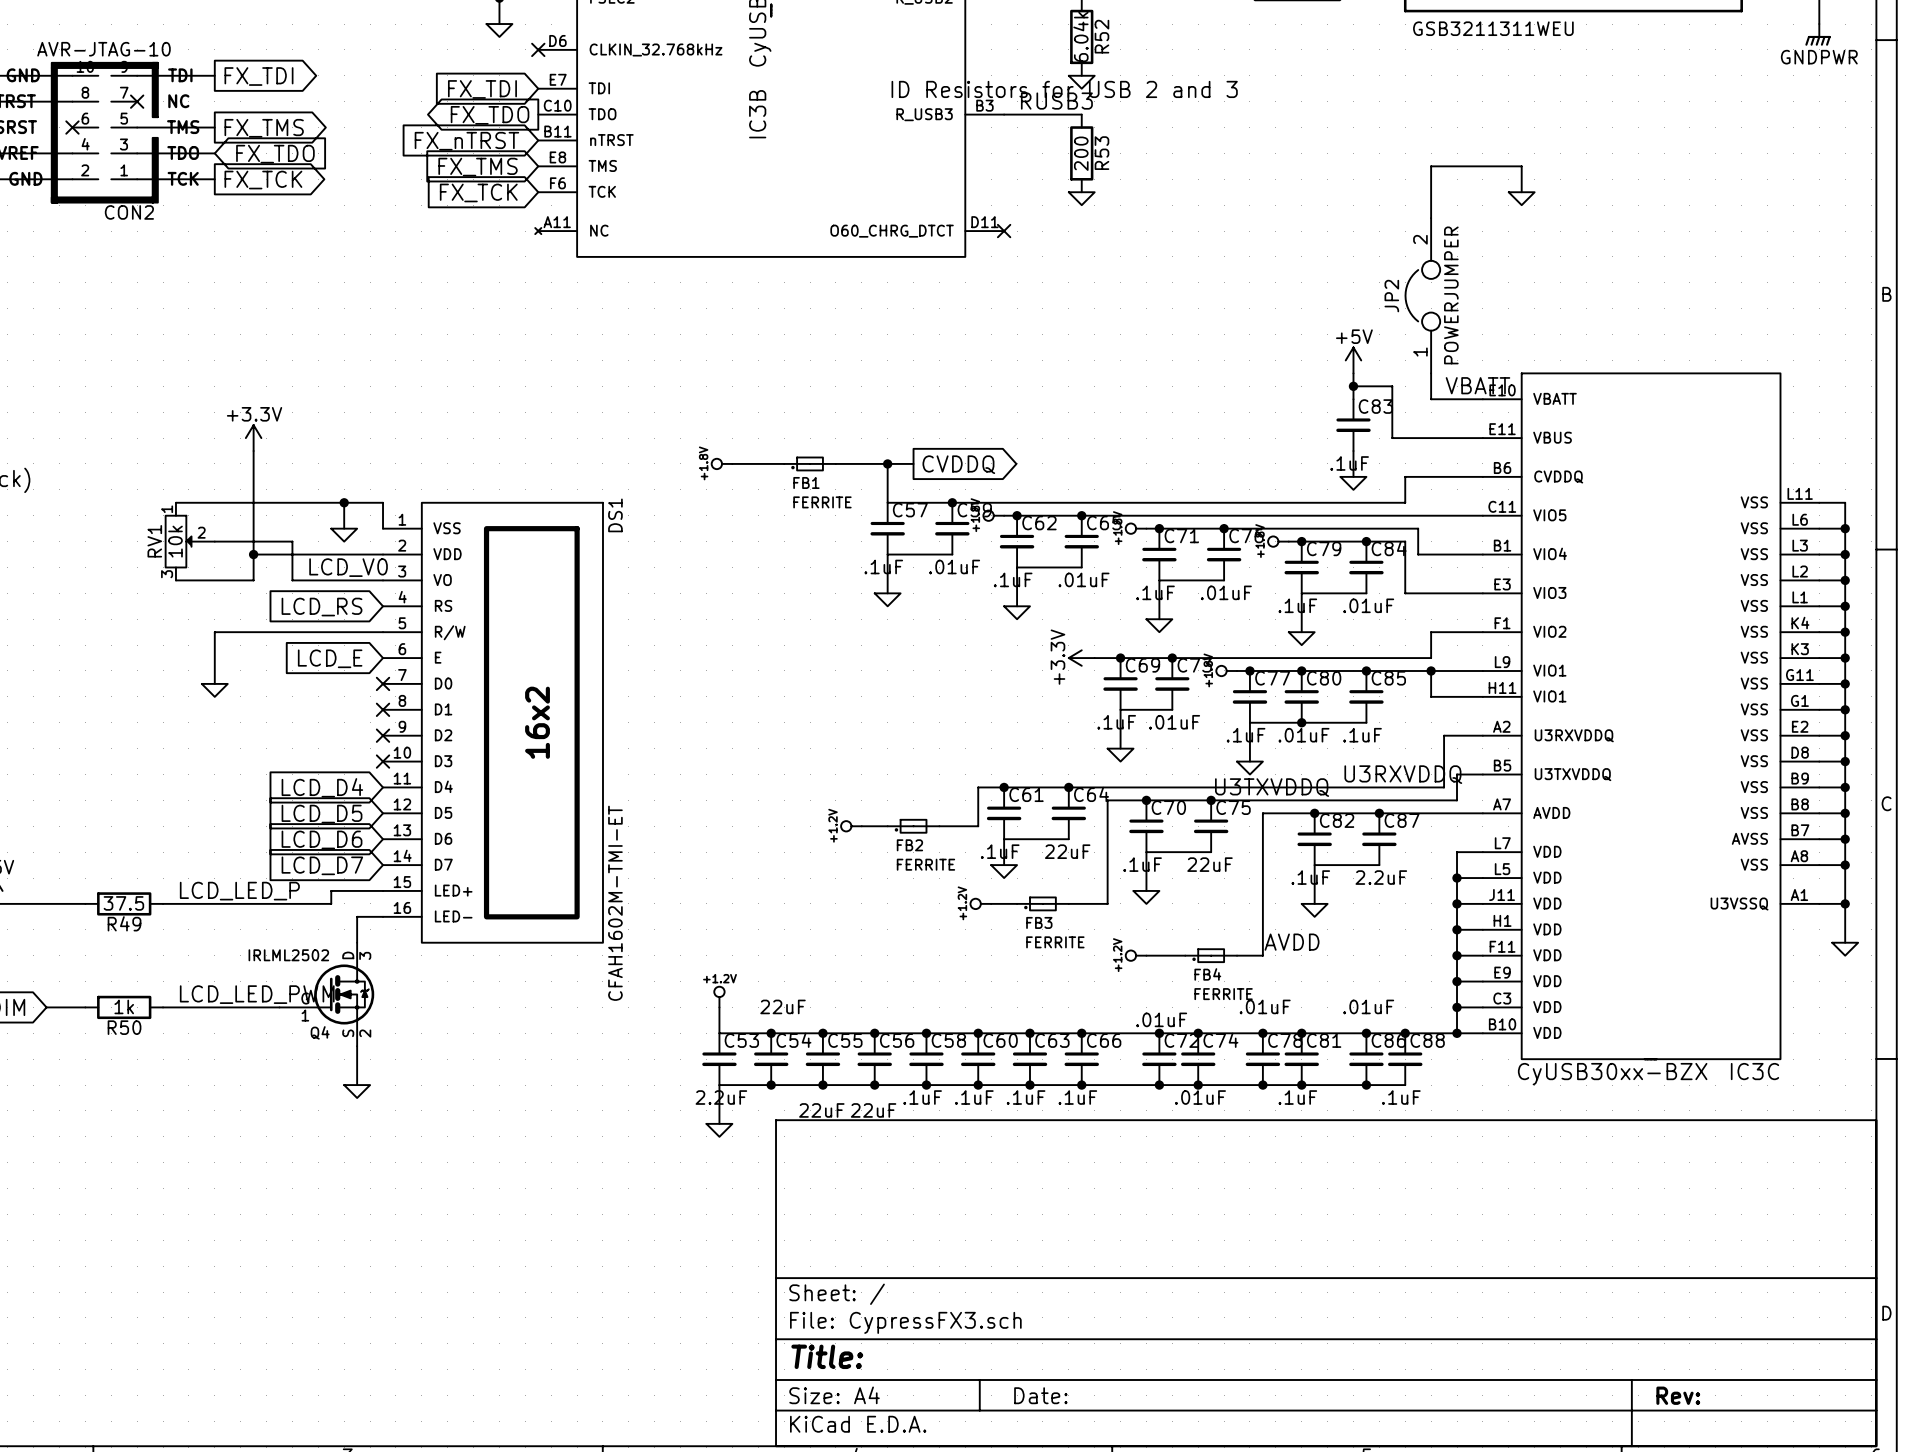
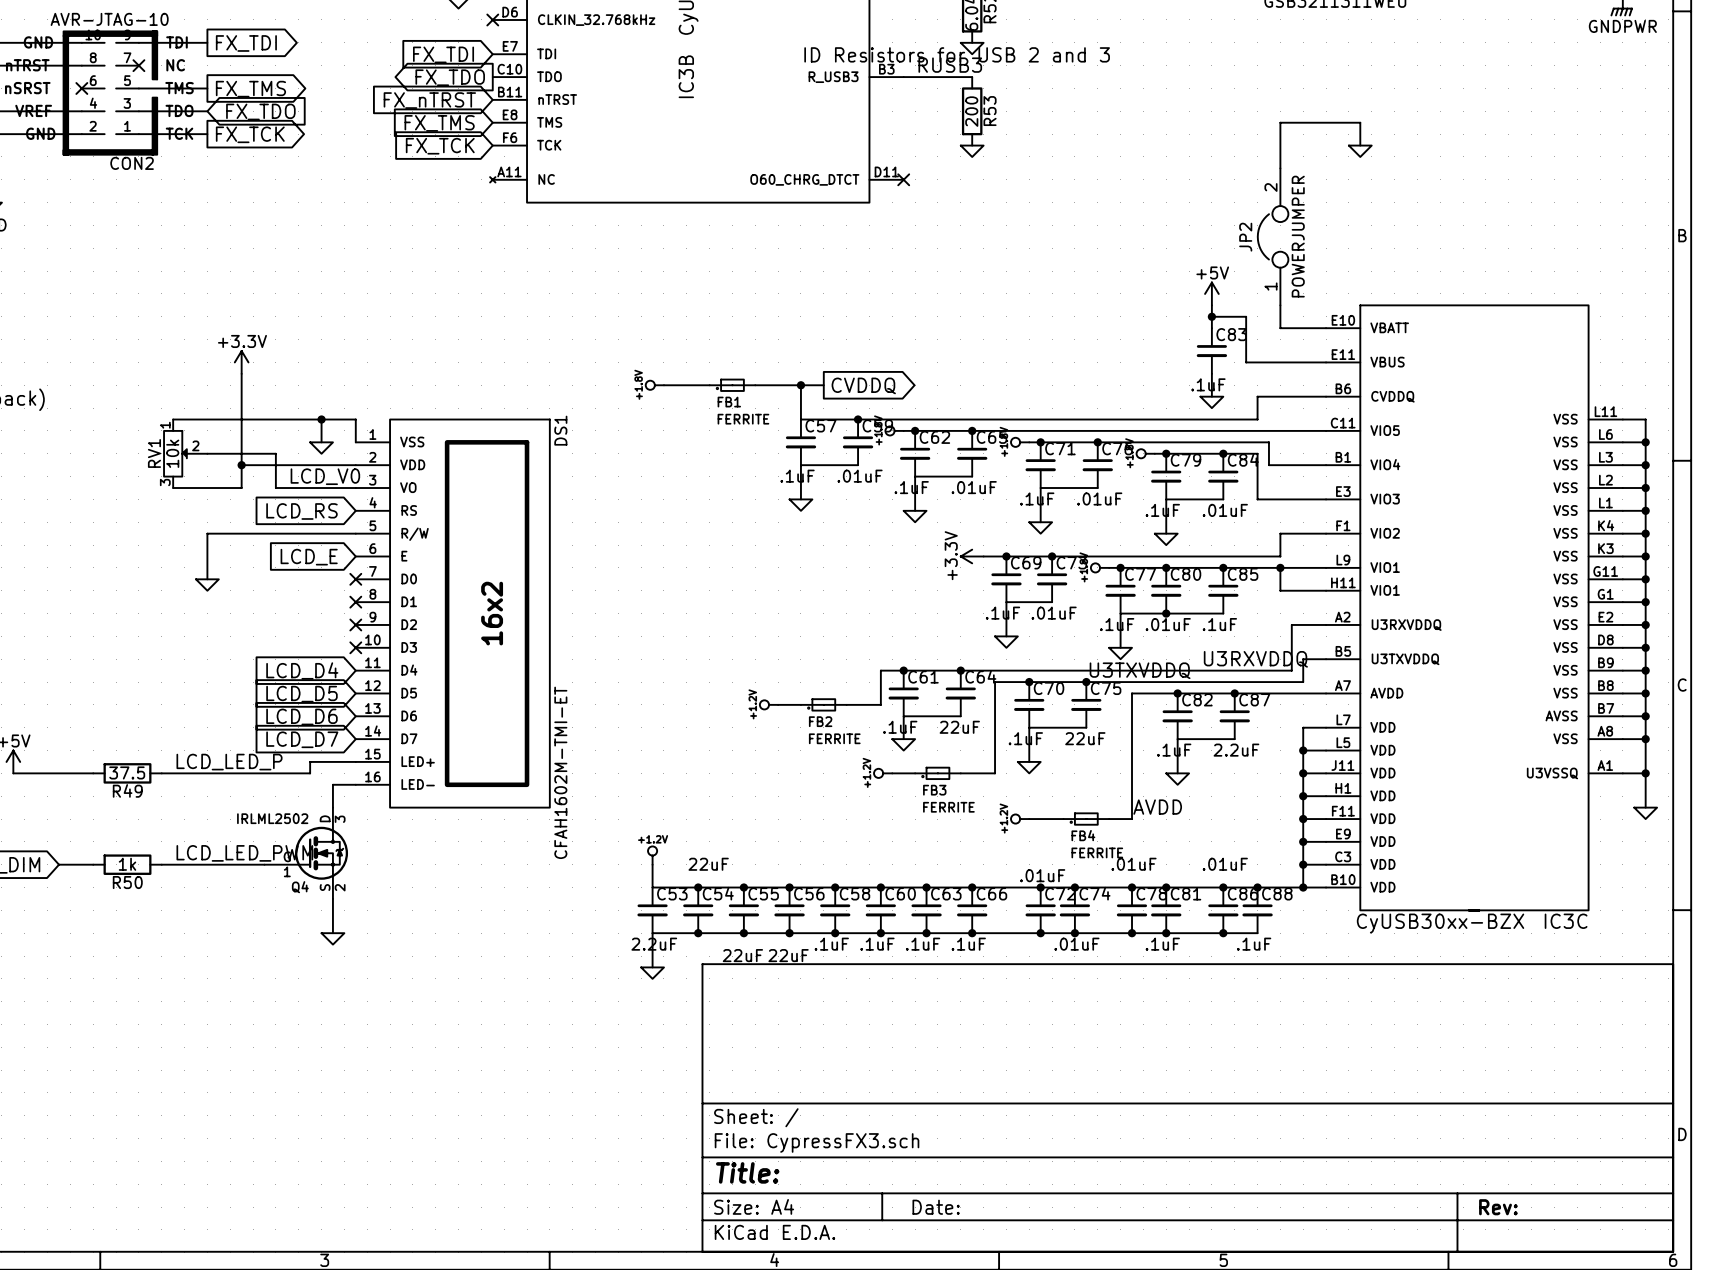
label: VBATT (1477, 385) -> none

